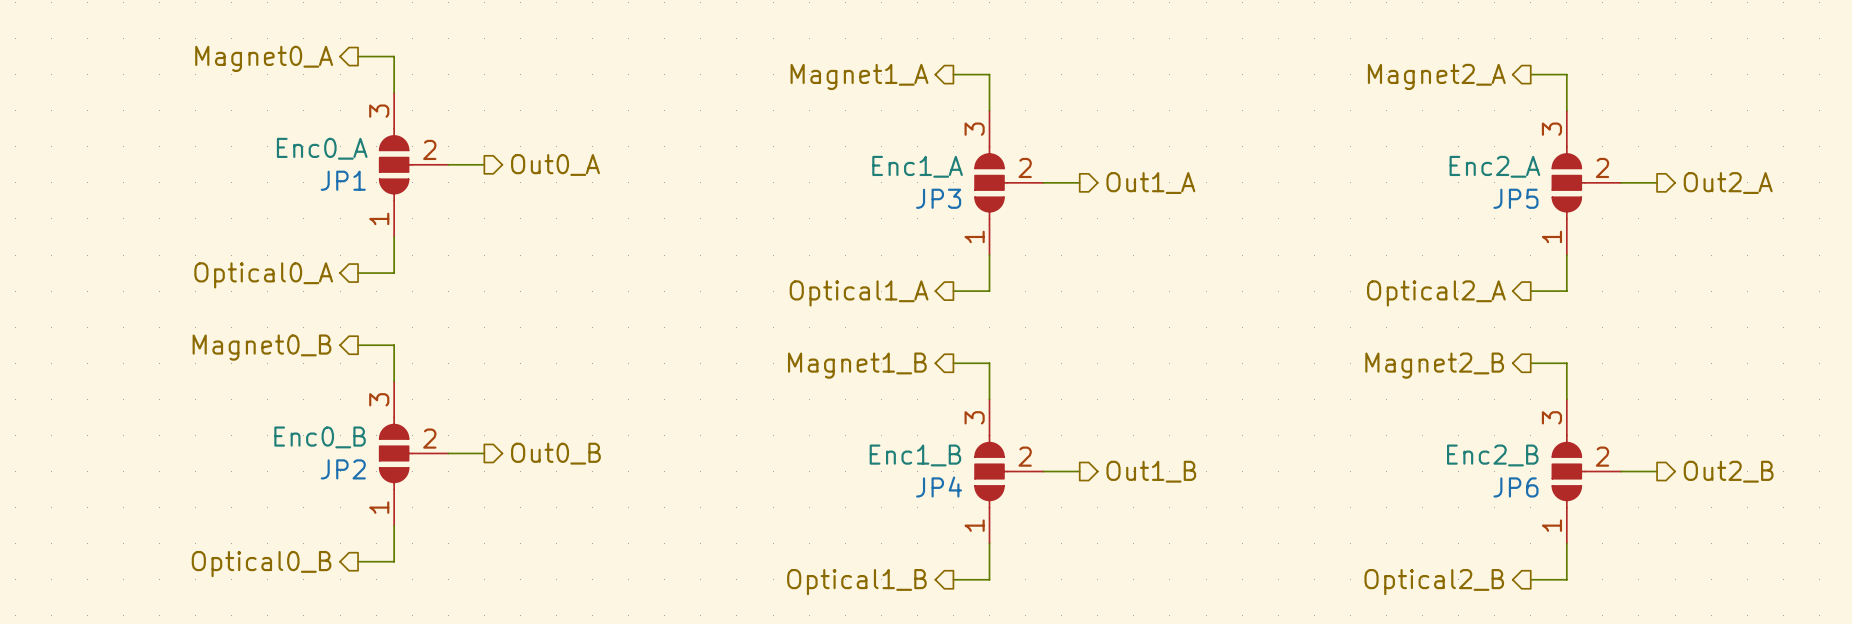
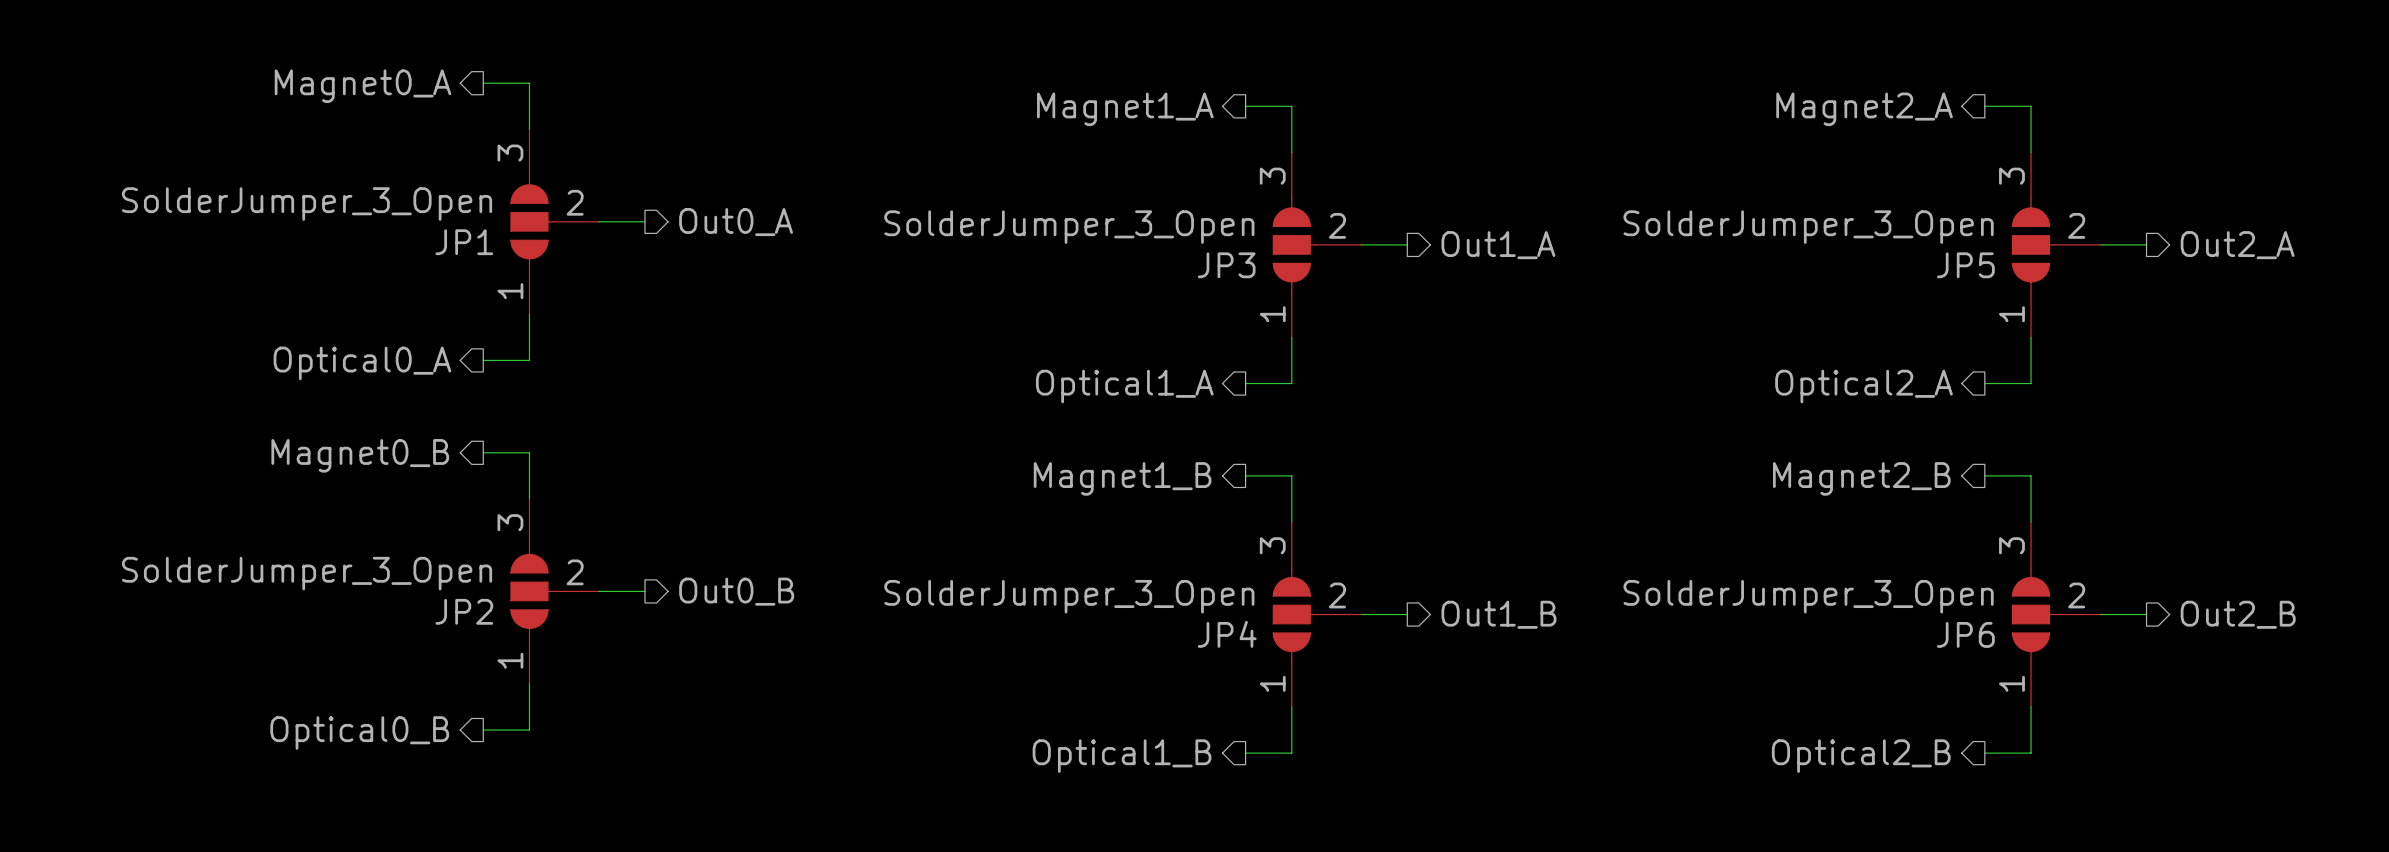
JP1 value: Enc0_A (322, 148) -> SolderJumper_3_Open (307, 204)
JP3 value: Enc1_A (917, 166) -> SolderJumper_3_Open (1069, 227)
JP5 value: Enc2_A (1494, 166) -> SolderJumper_3_Open (1808, 227)
JP2 value: Enc0_B (320, 437) -> SolderJumper_3_Open (307, 573)
JP4 value: Enc1_B (915, 455) -> SolderJumper_3_Open (1069, 596)
JP6 value: Enc2_B (1492, 455) -> SolderJumper_3_Open (1808, 596)

